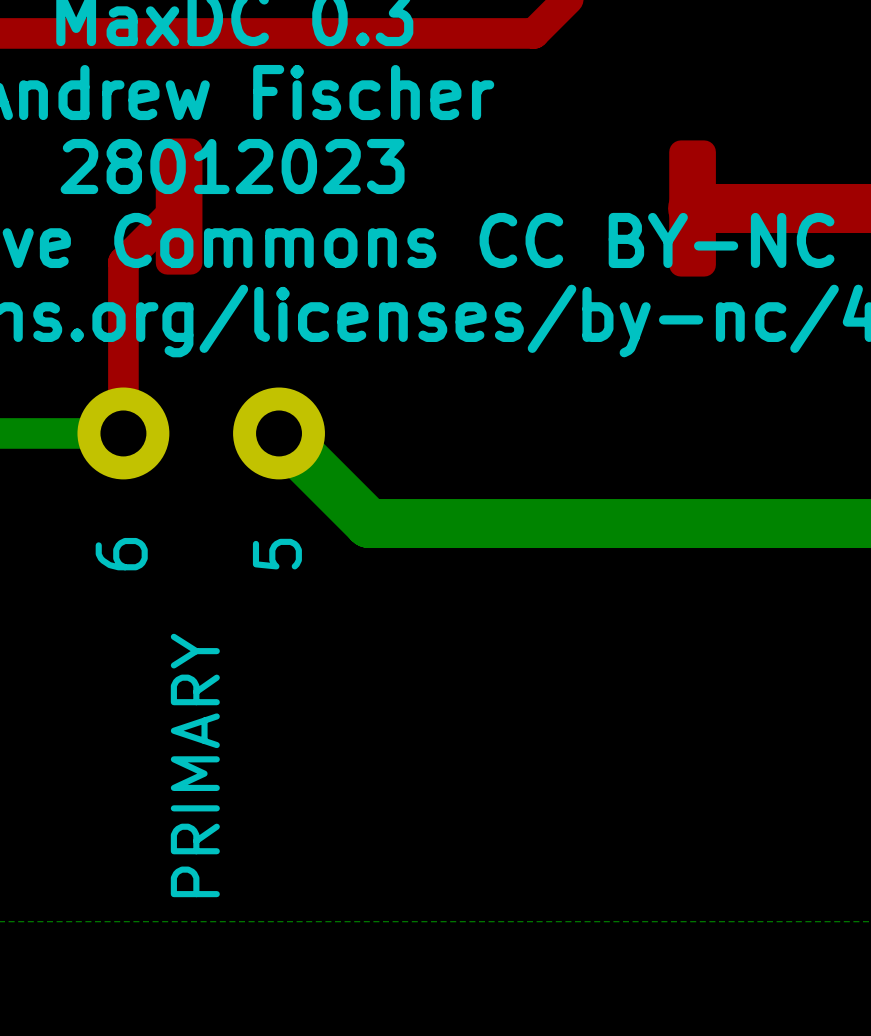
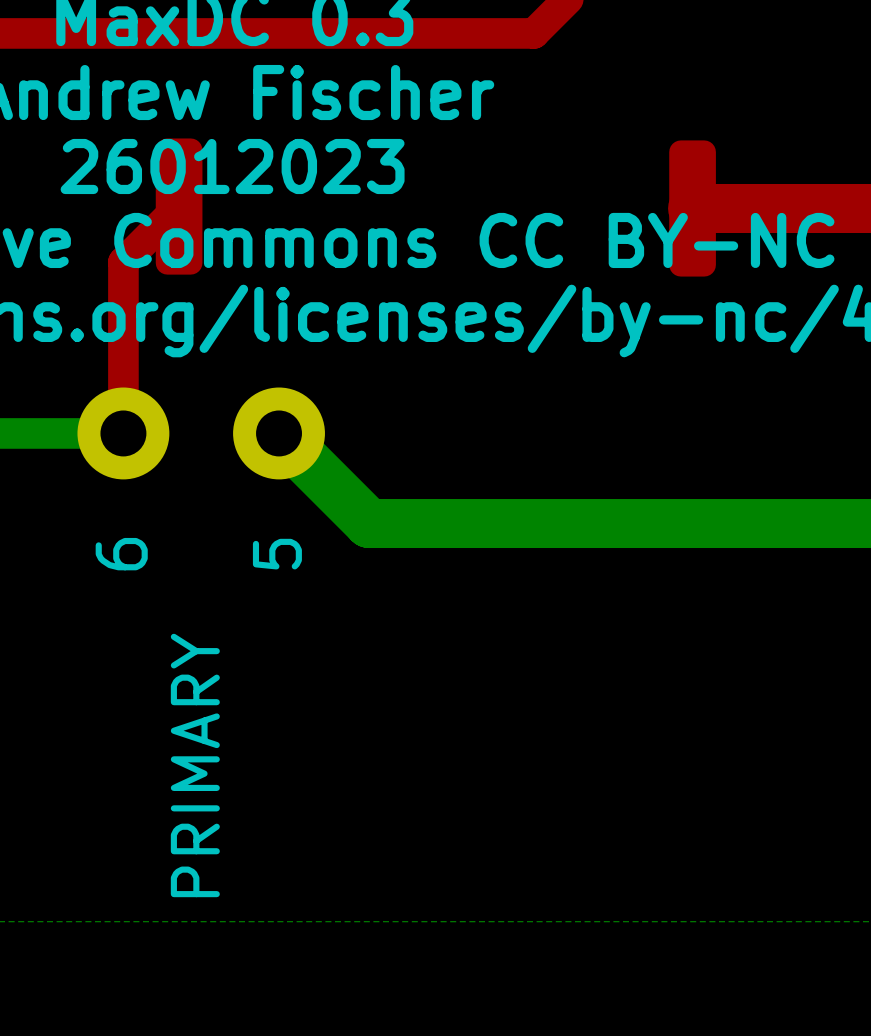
text: 28012023 (232, 166) -> 26012023 (232, 166)

